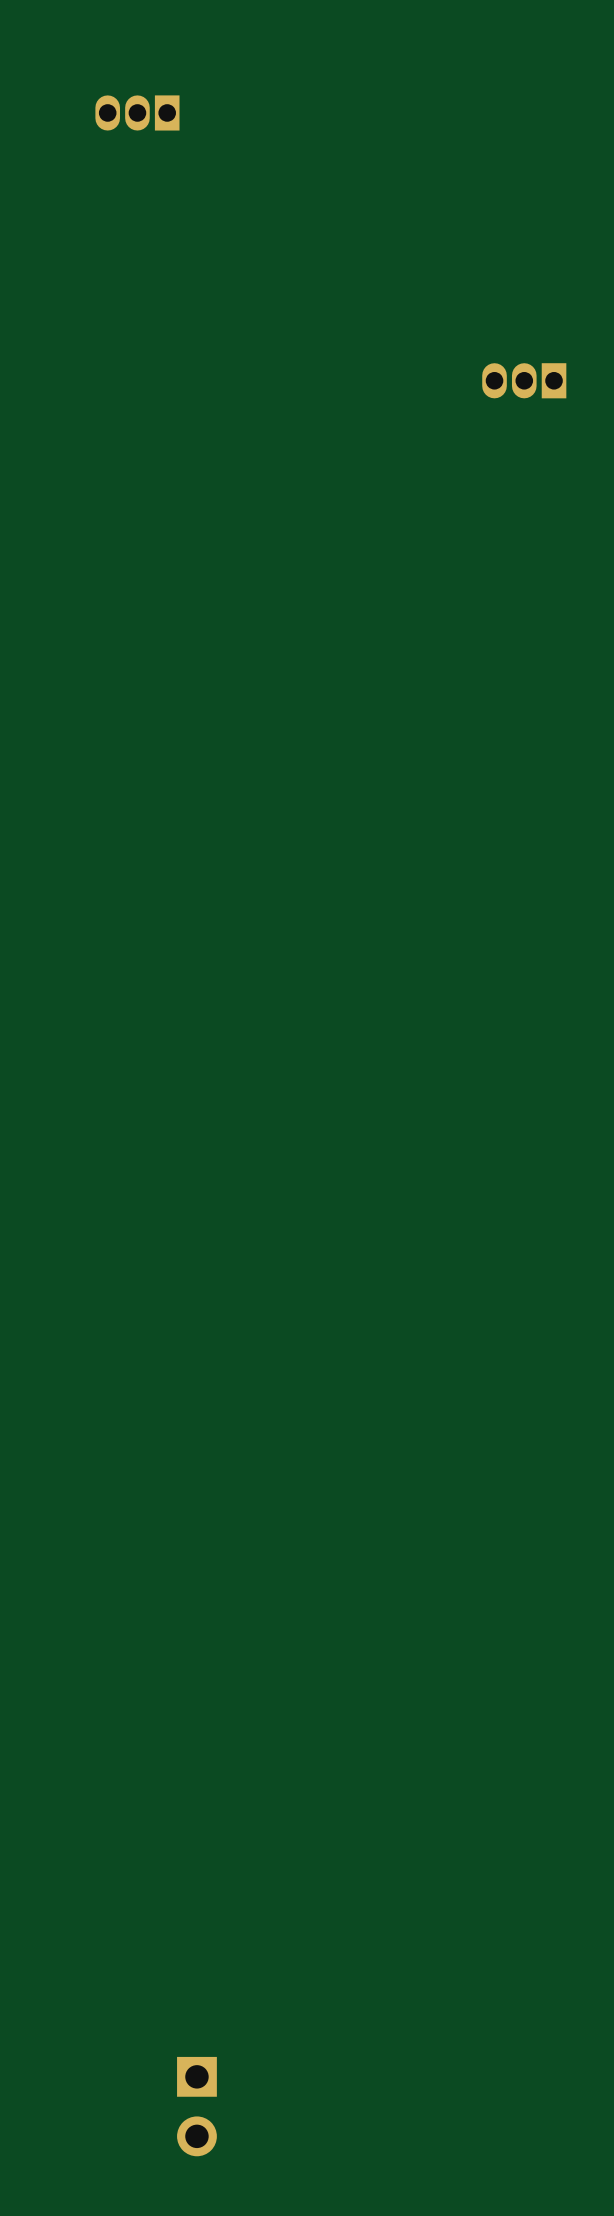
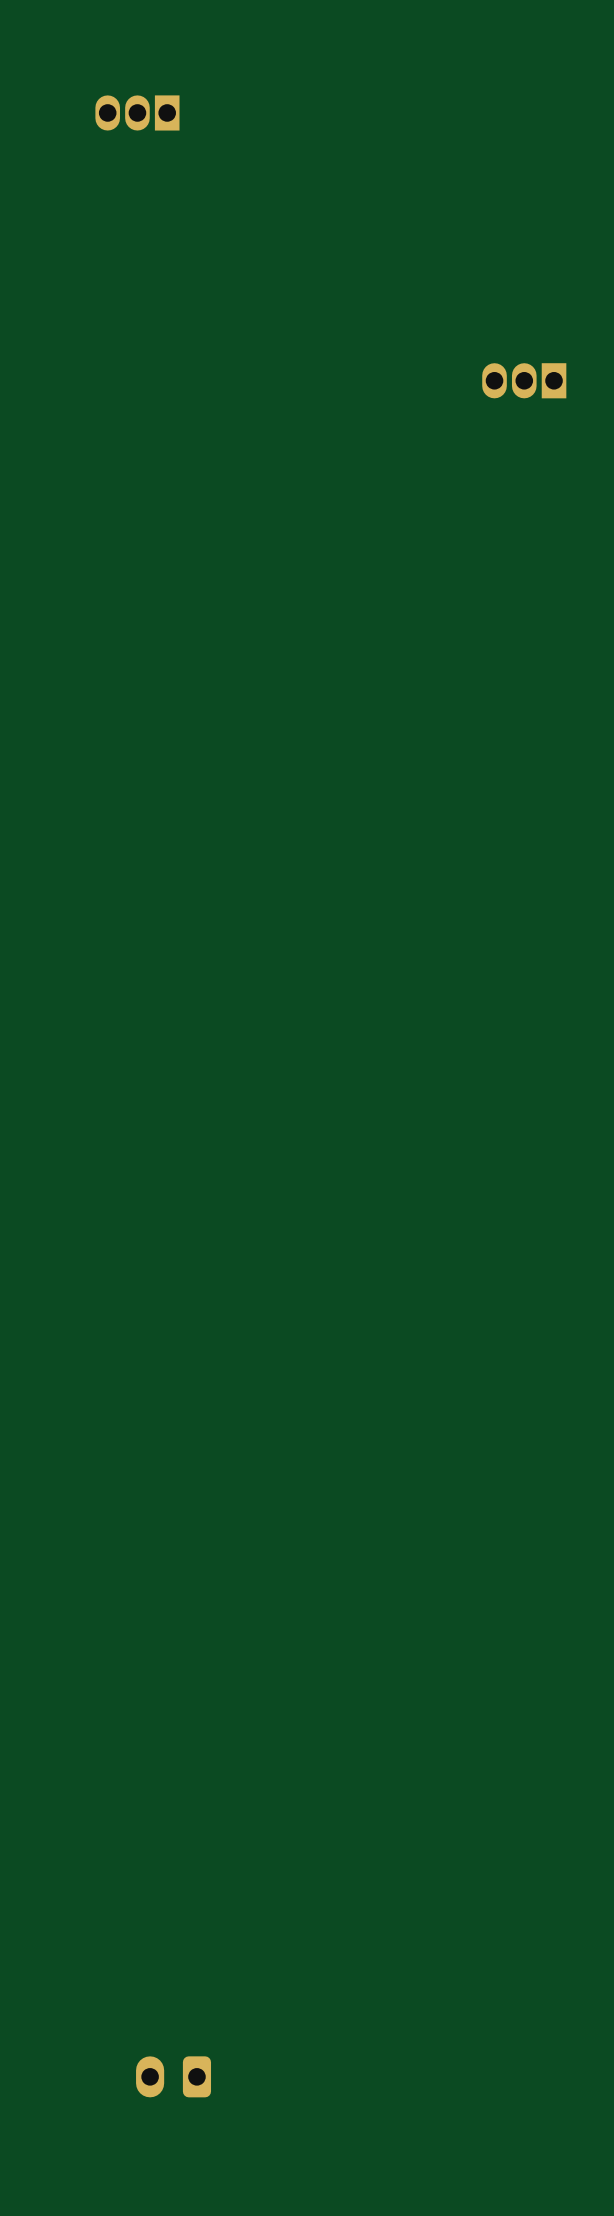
part: none -> (173, 2076)
part: (196, 2106) -> none

